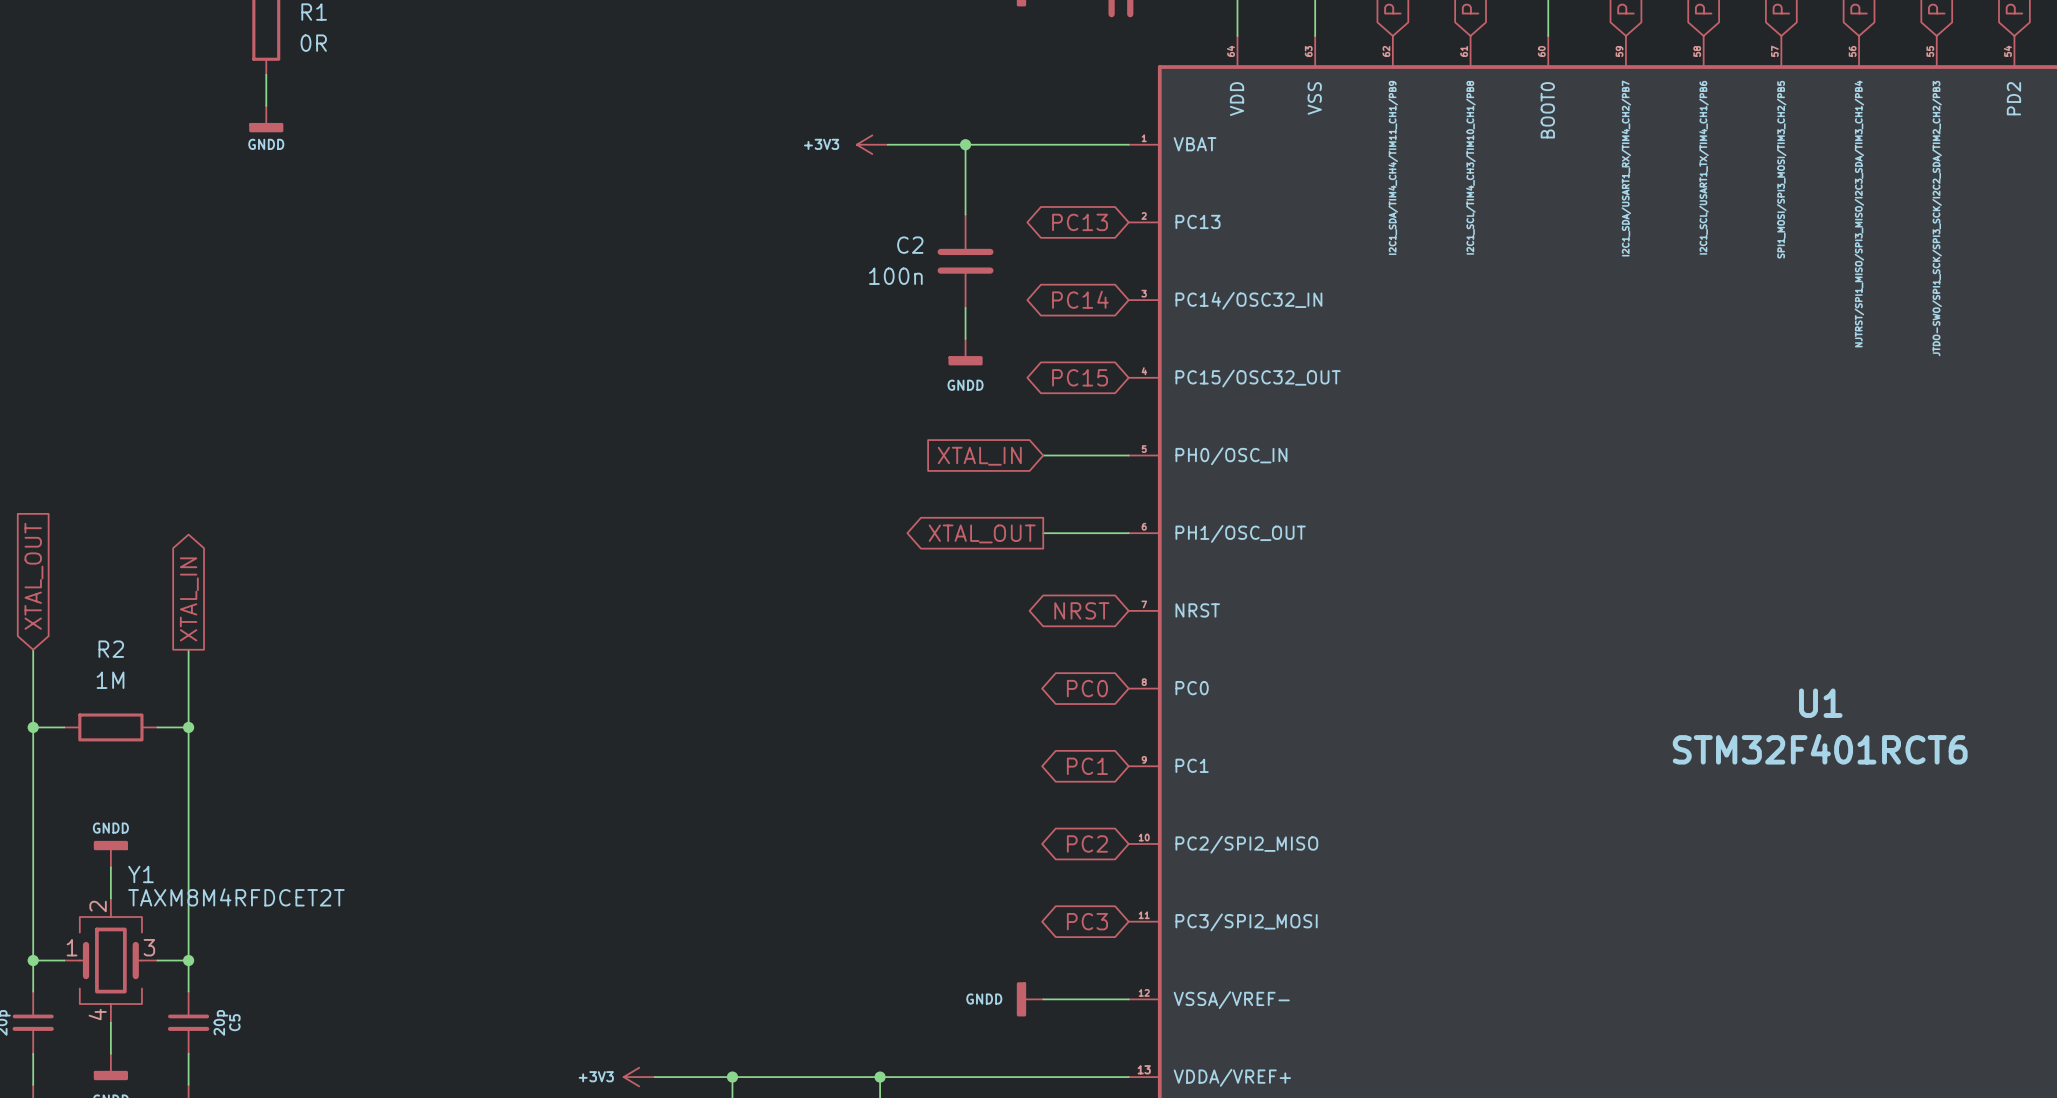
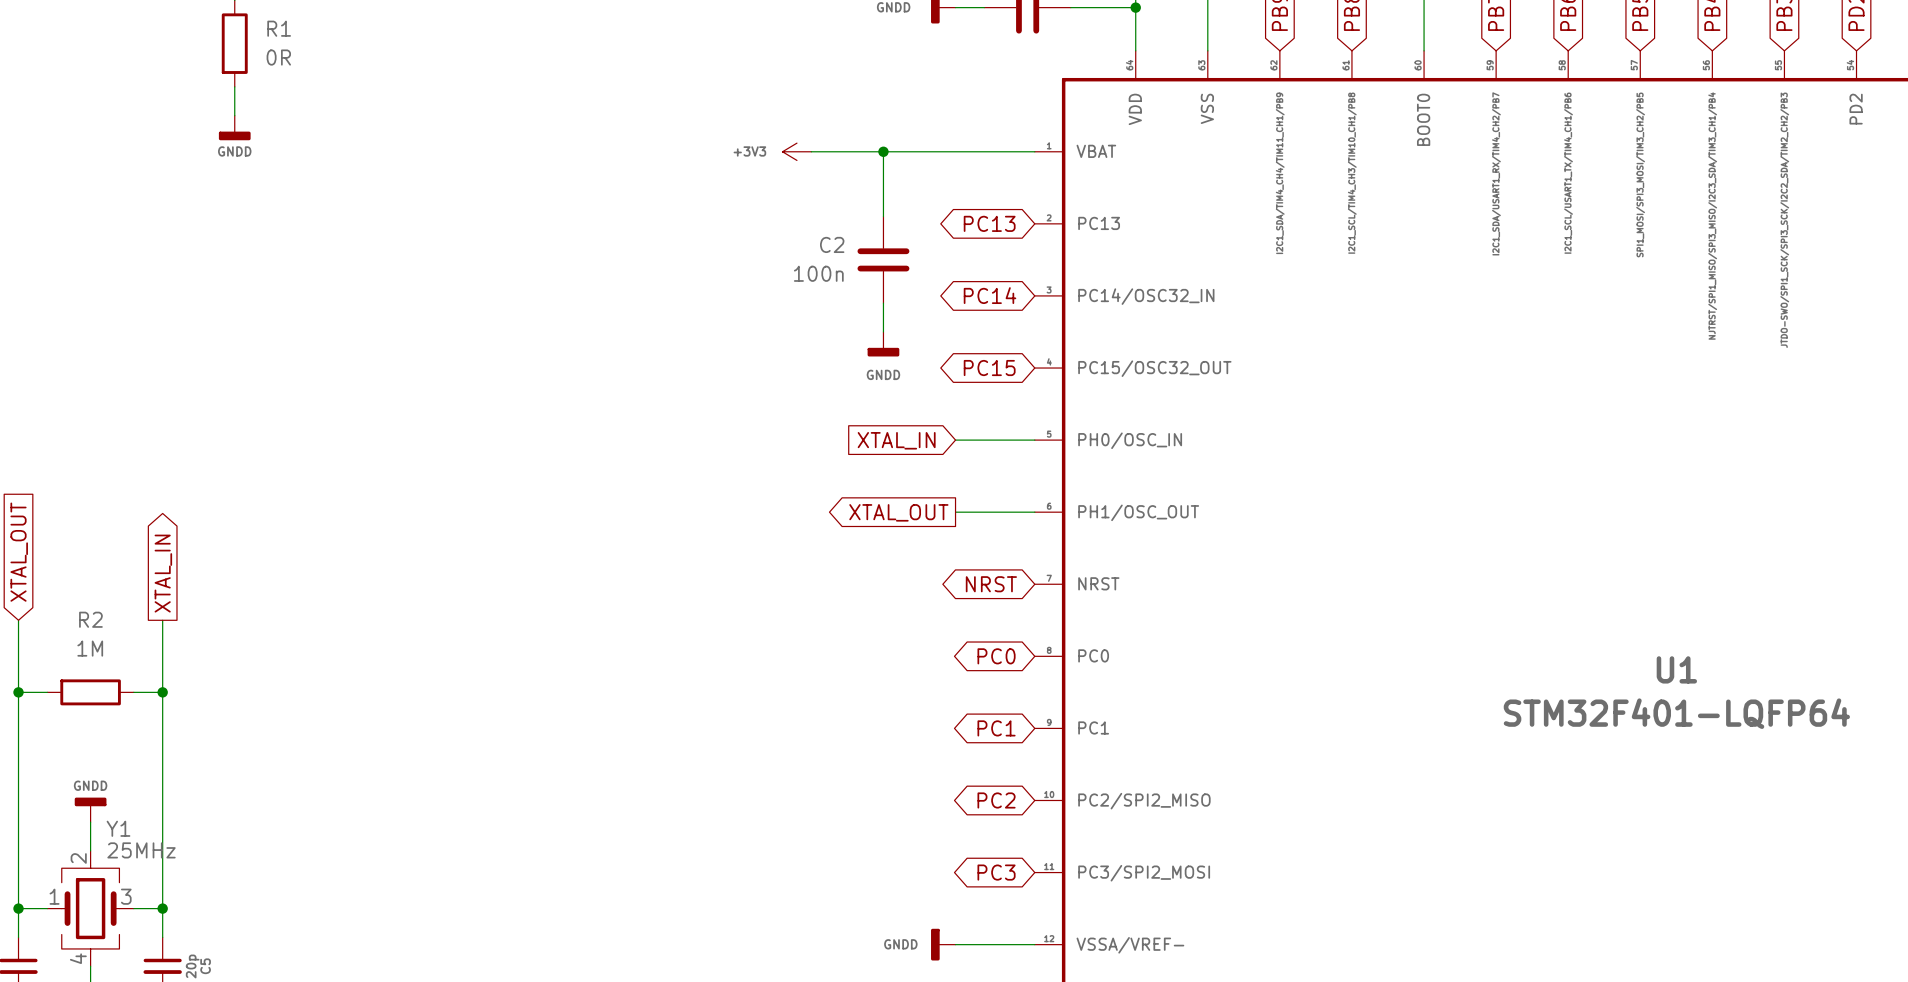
U1 value: STM32F401RCT6 (1820, 749) -> STM32F401-LQFP64 (1676, 713)
Y1 value: TAXM8M4RFDCET2T (236, 897) -> 25MHz (141, 850)

